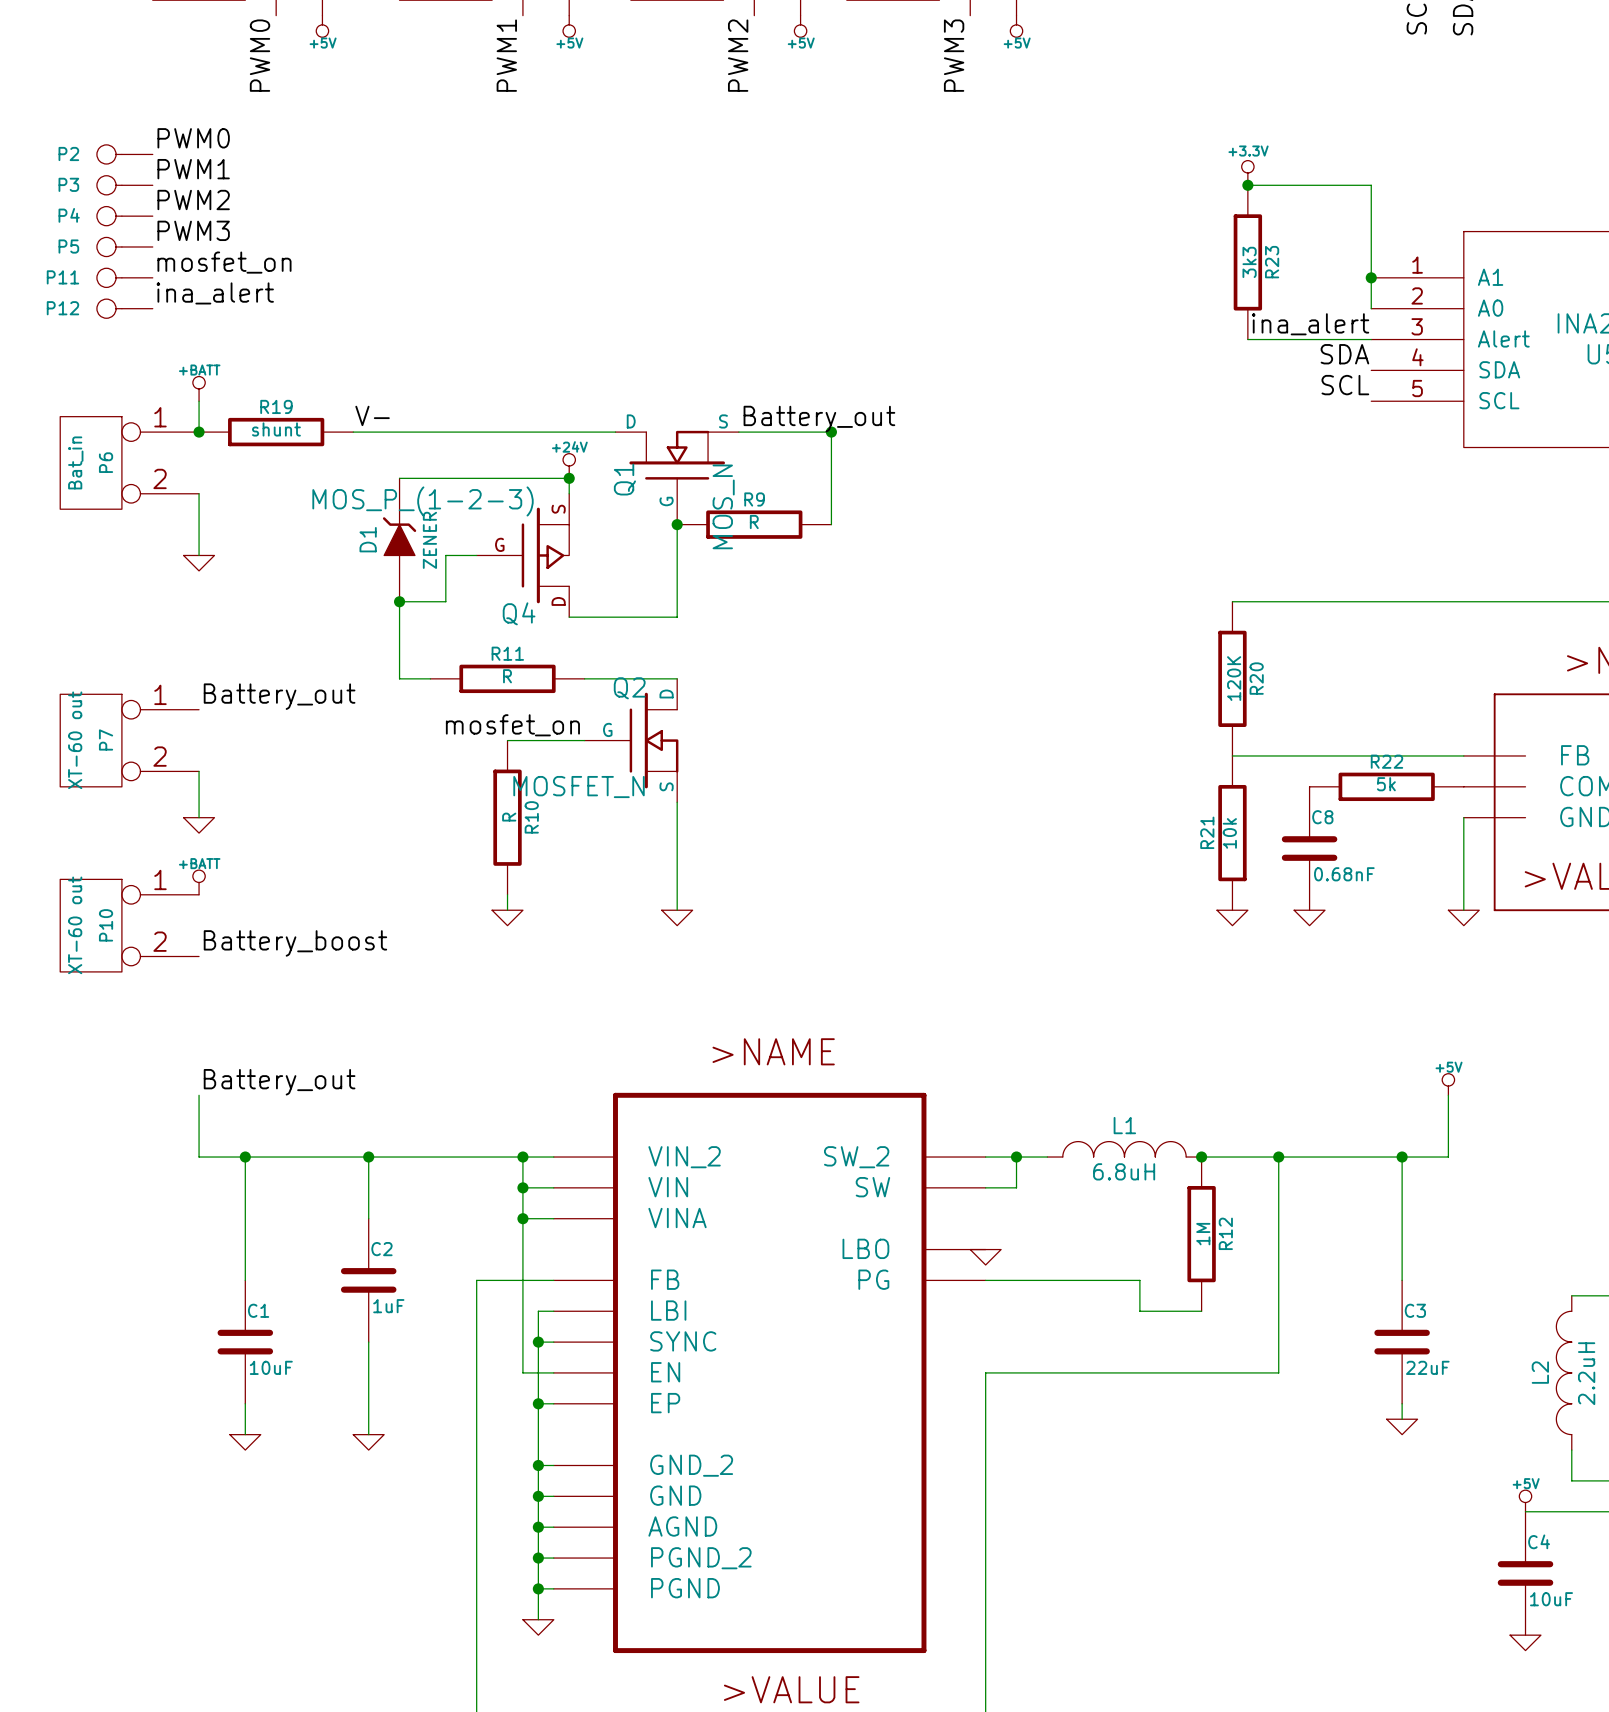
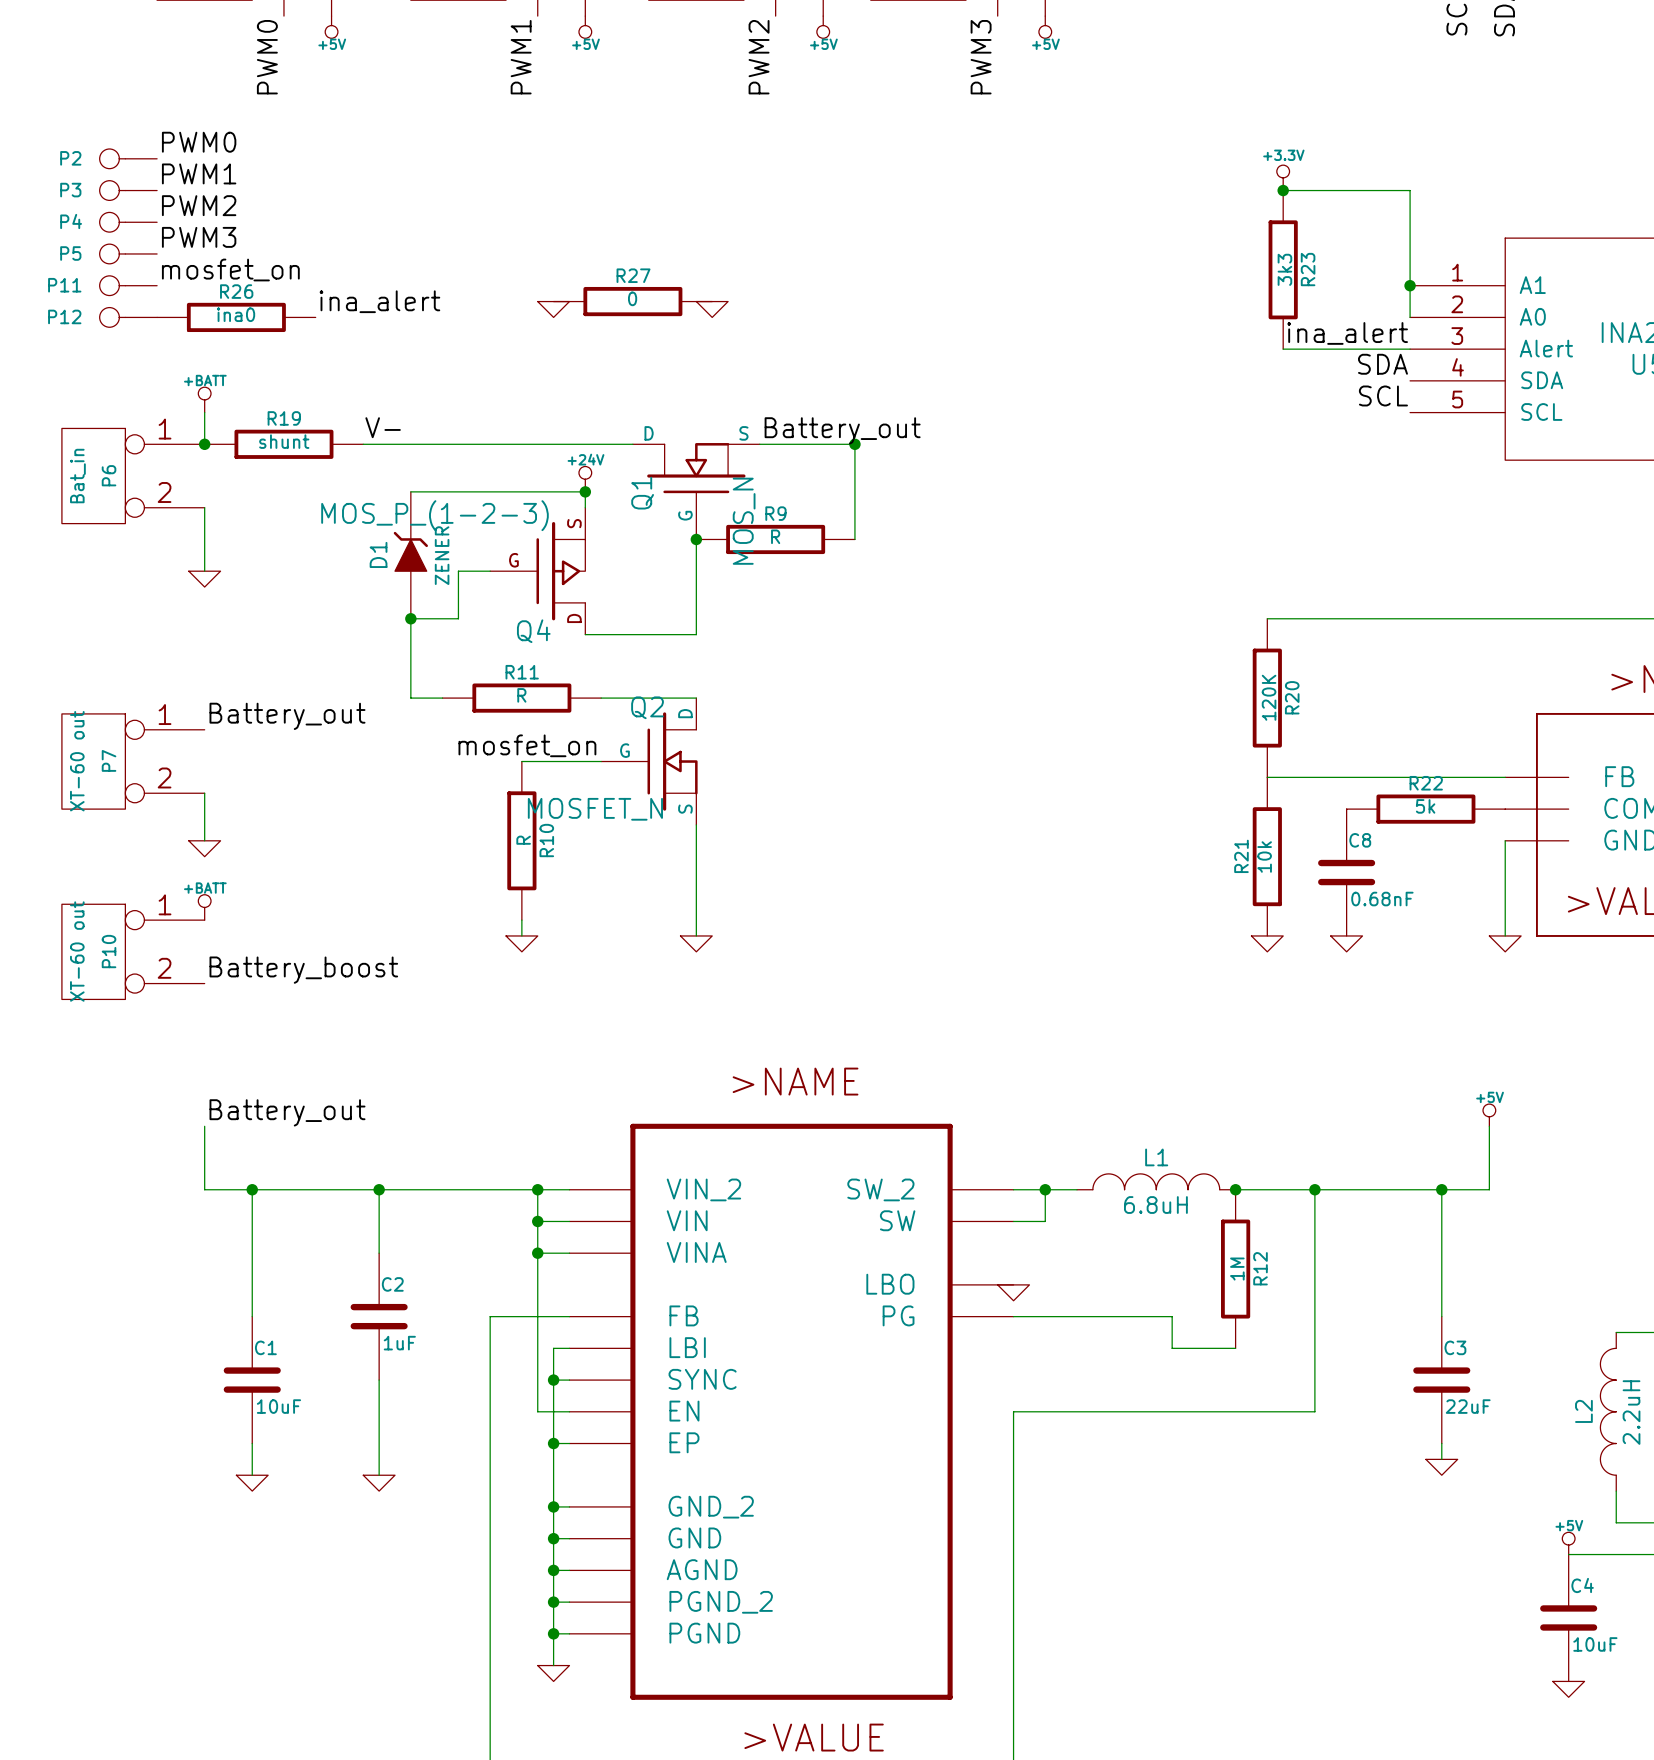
label position: ina_alert (215, 293) -> ina_alert (379, 301)
R27: none -> 0 (632, 301)
power symbol: none -> (553, 309)
power symbol: none -> (712, 309)
R26: none -> ina0 (236, 317)

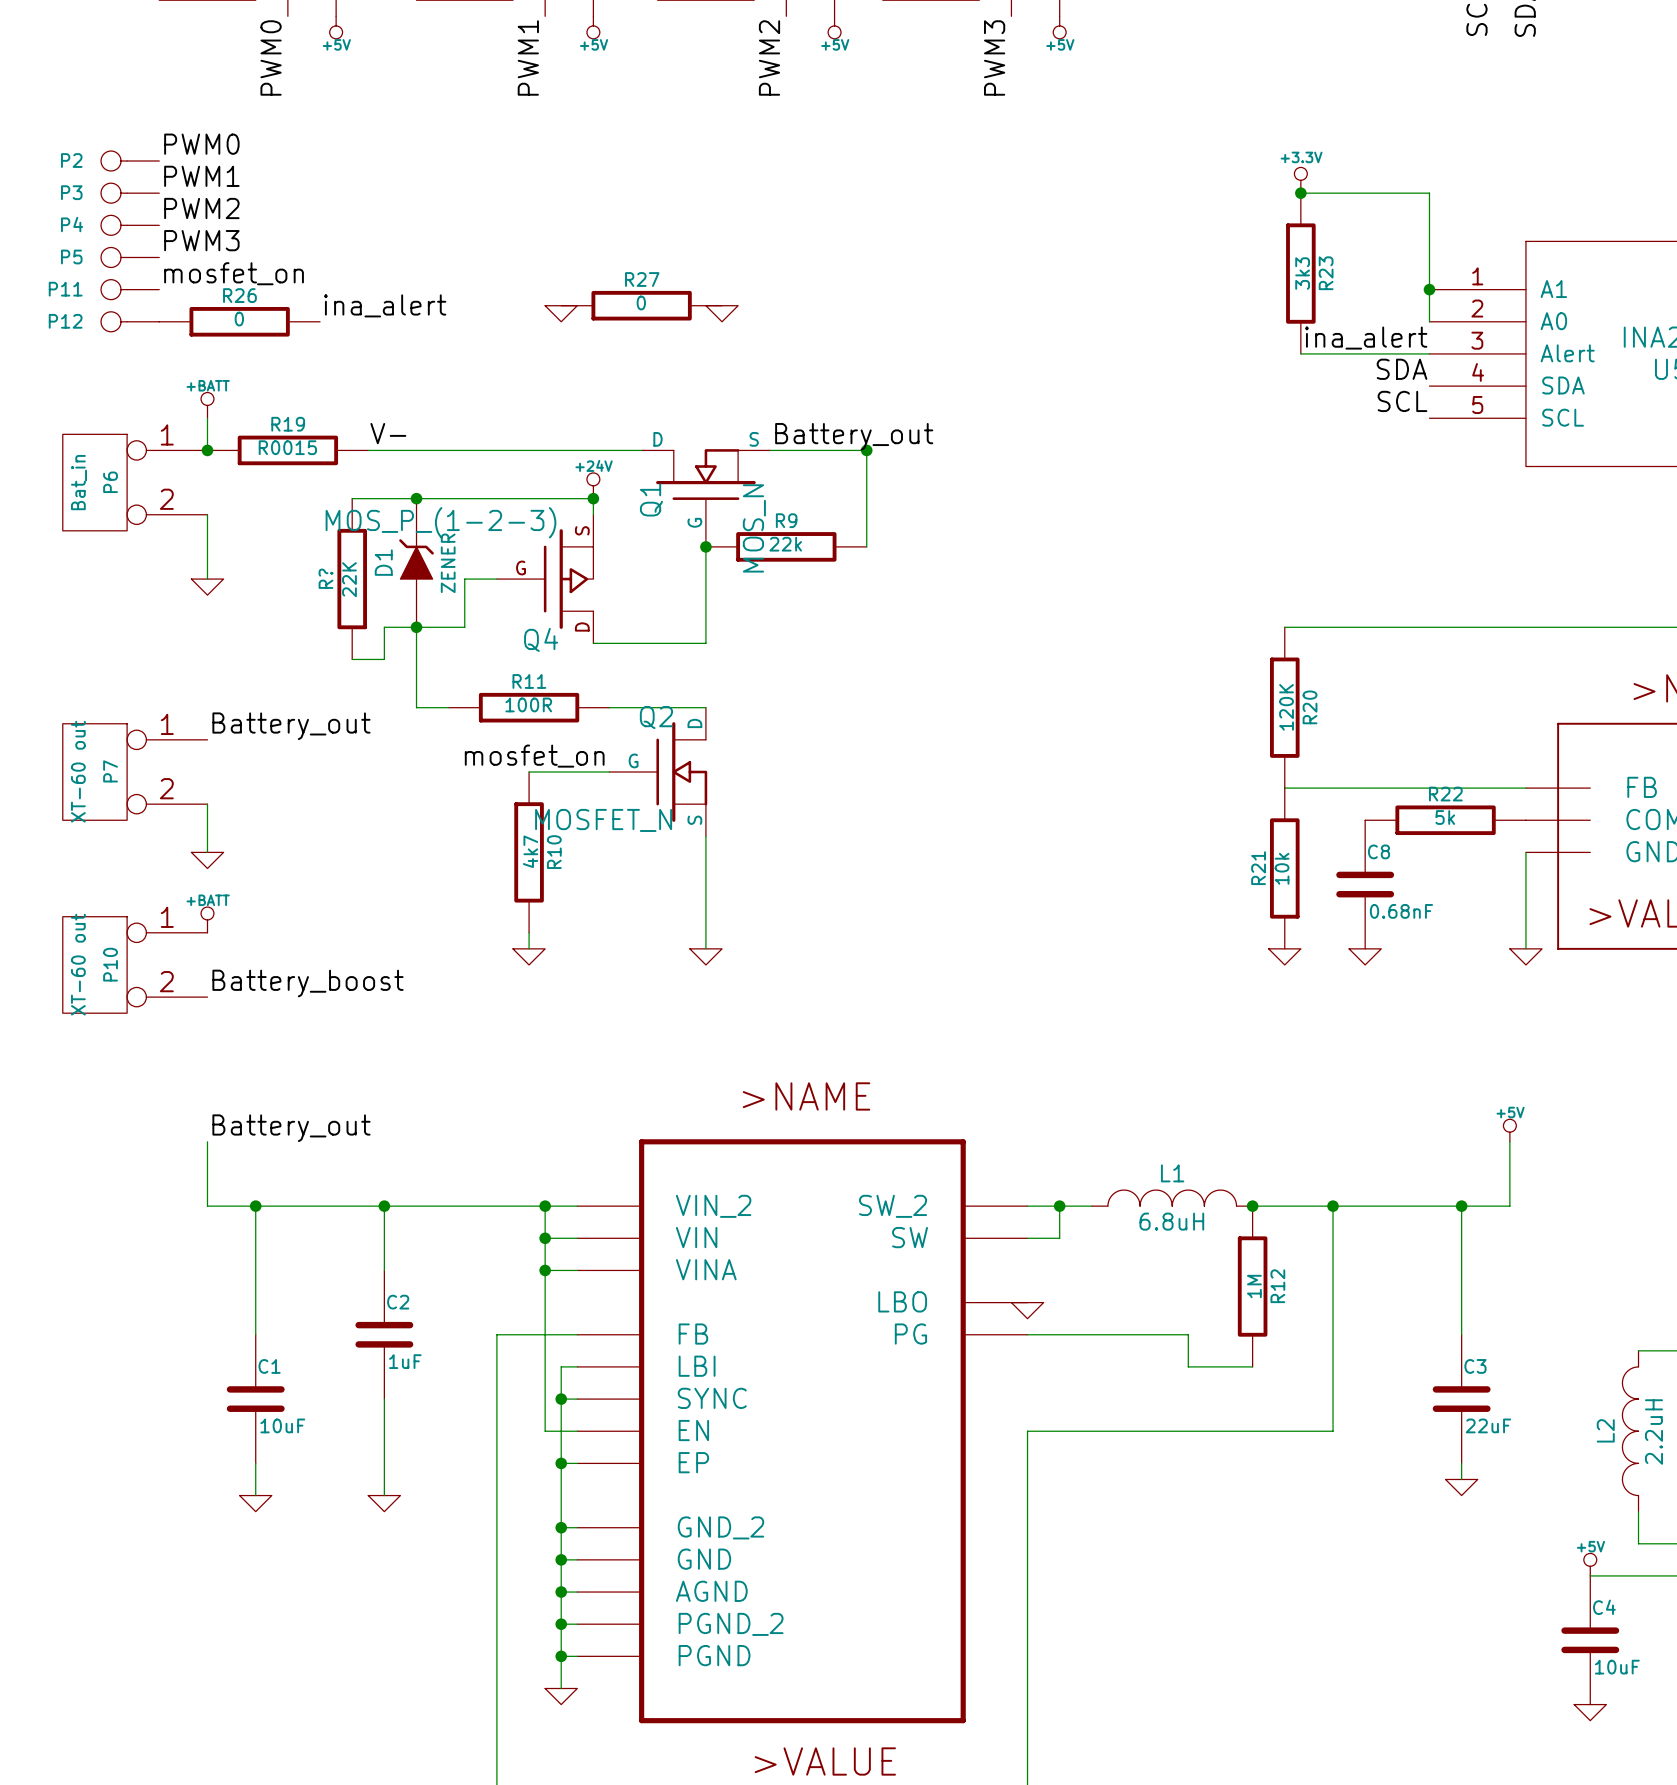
R26 value: ina0 (236, 314) -> 0 (239, 319)
R19 value: shunt (284, 441) -> R0015 (287, 447)
wire: none -> (352, 498) (416, 498)
junction: none -> (416, 498)
R9 value: R (775, 536) -> 22k (785, 544)
R?: none -> 22K (352, 579)
wire: none -> (416, 627) (384, 627) (384, 659) (352, 659)
R11 value: R (521, 695) -> 100R (528, 704)
R10 value: R (523, 840) -> 4k7 (530, 851)

